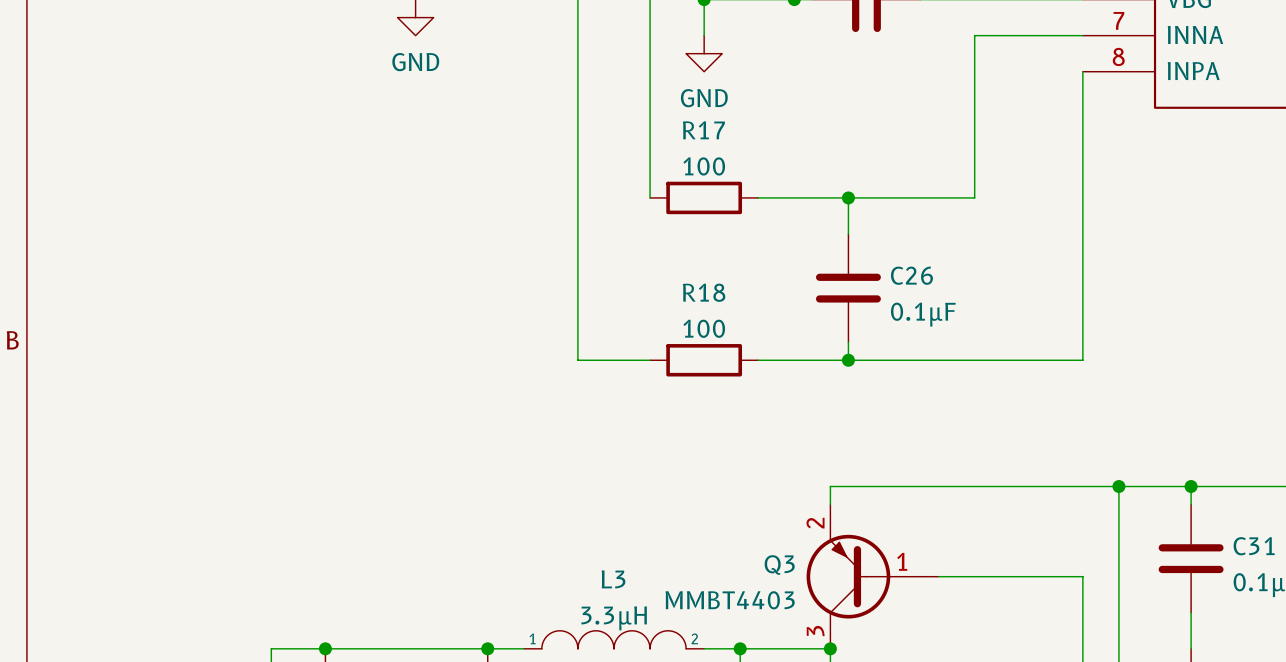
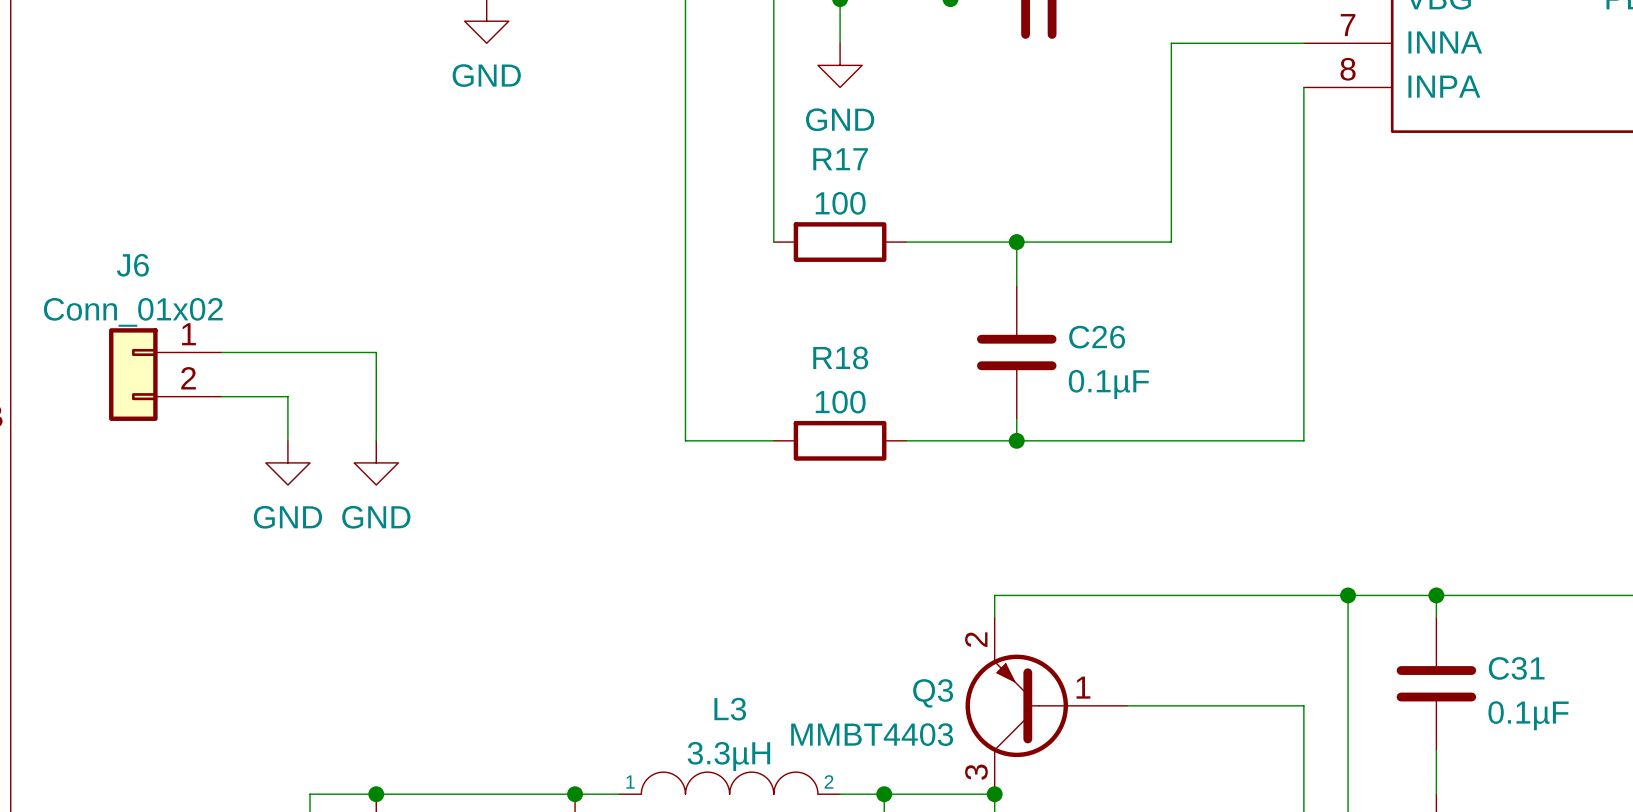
wire: none -> (221, 352) (376, 352) (376, 440)
J6: none -> Conn_01x02 (165, 374)
wire: none -> (221, 396) (287, 396) (287, 440)
power symbol: none -> GND (287, 462)
power symbol: none -> GND (376, 462)

